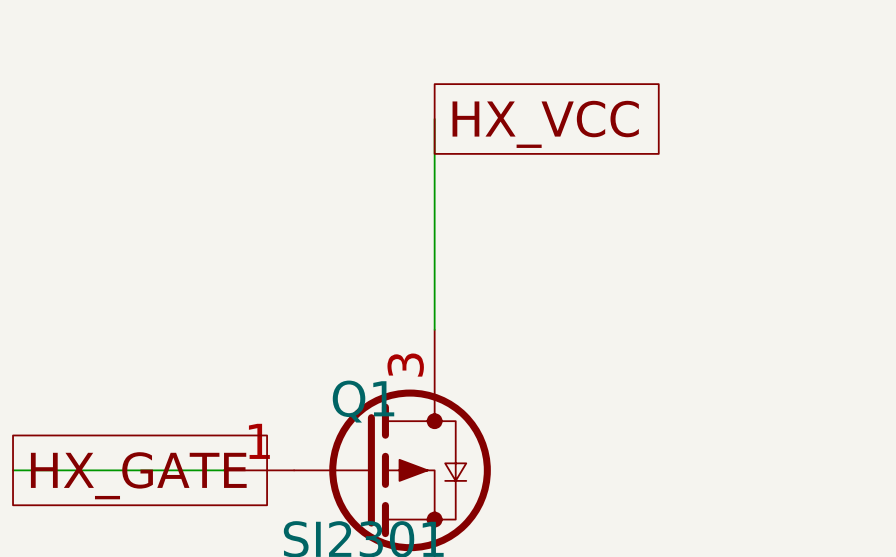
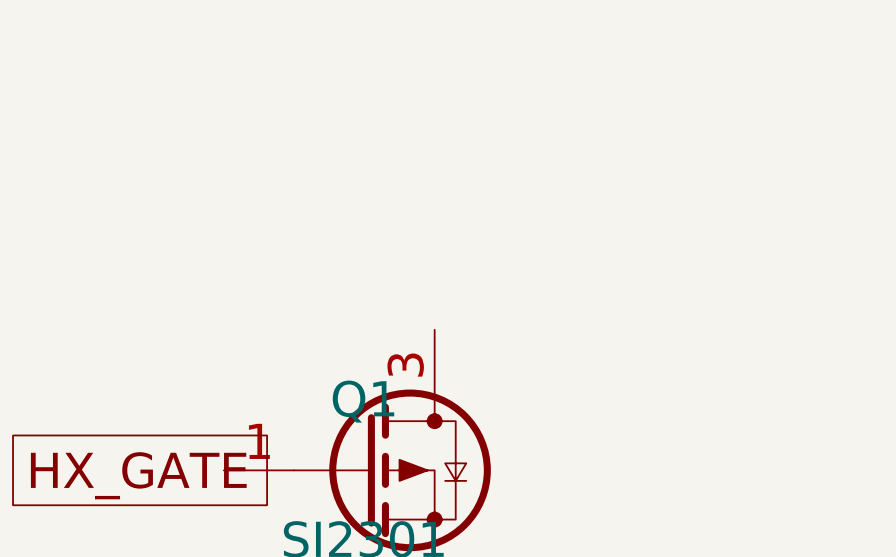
wire: (434, 119) (434, 329) -> none
global label: HX_VCC (545, 124) -> none
wire: (13, 470) (223, 470) -> none

